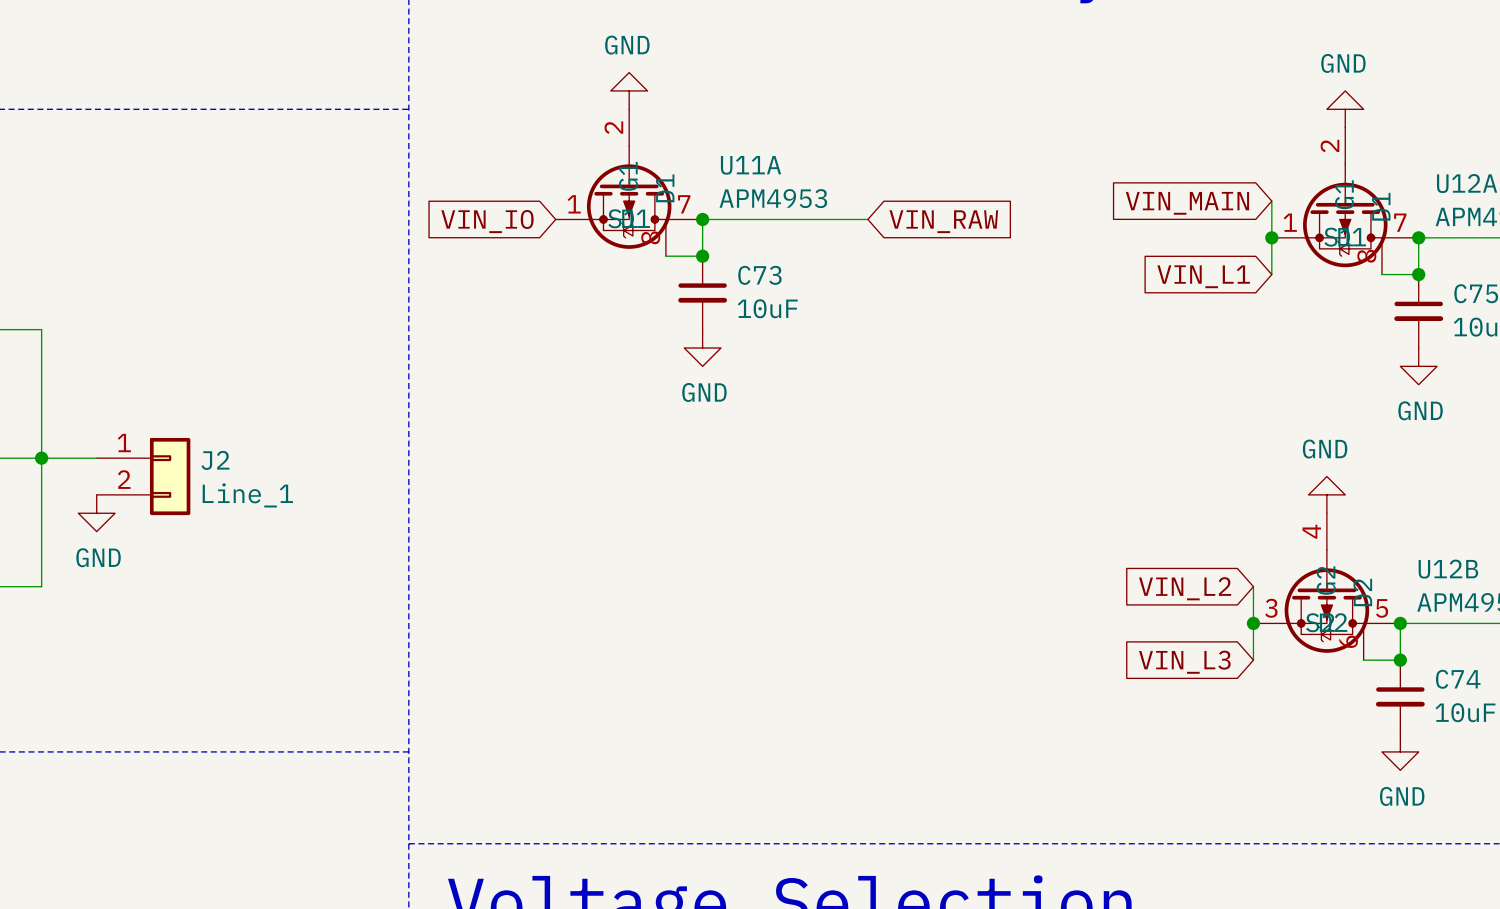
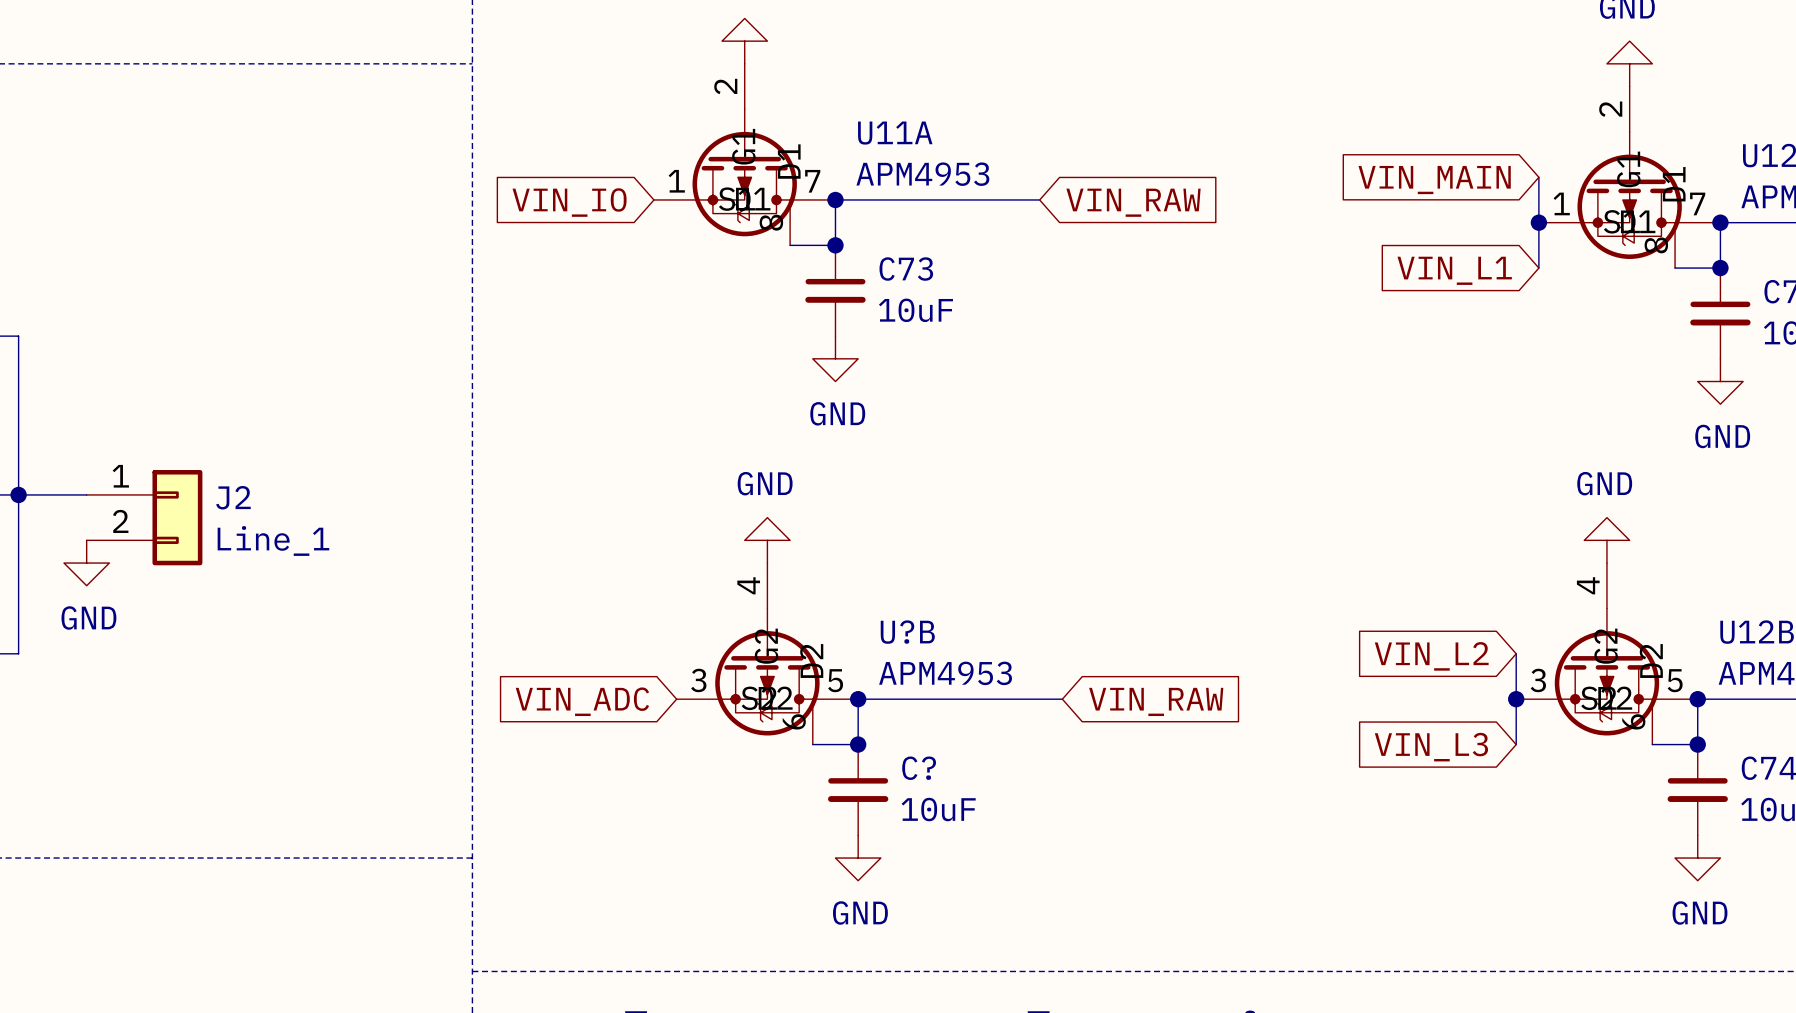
power symbol: none -> GND (767, 540)
U?B: none -> APM4953 (767, 653)
junction: none -> (858, 699)
wire: none -> (1062, 699) (858, 699) (858, 744) (812, 744)
global label: none -> VIN_ADC (582, 701)
global label: none -> VIN_RAW (1156, 701)
junction: none -> (858, 744)
C?: none -> 10uF (858, 789)
power symbol: none -> GND (858, 858)

